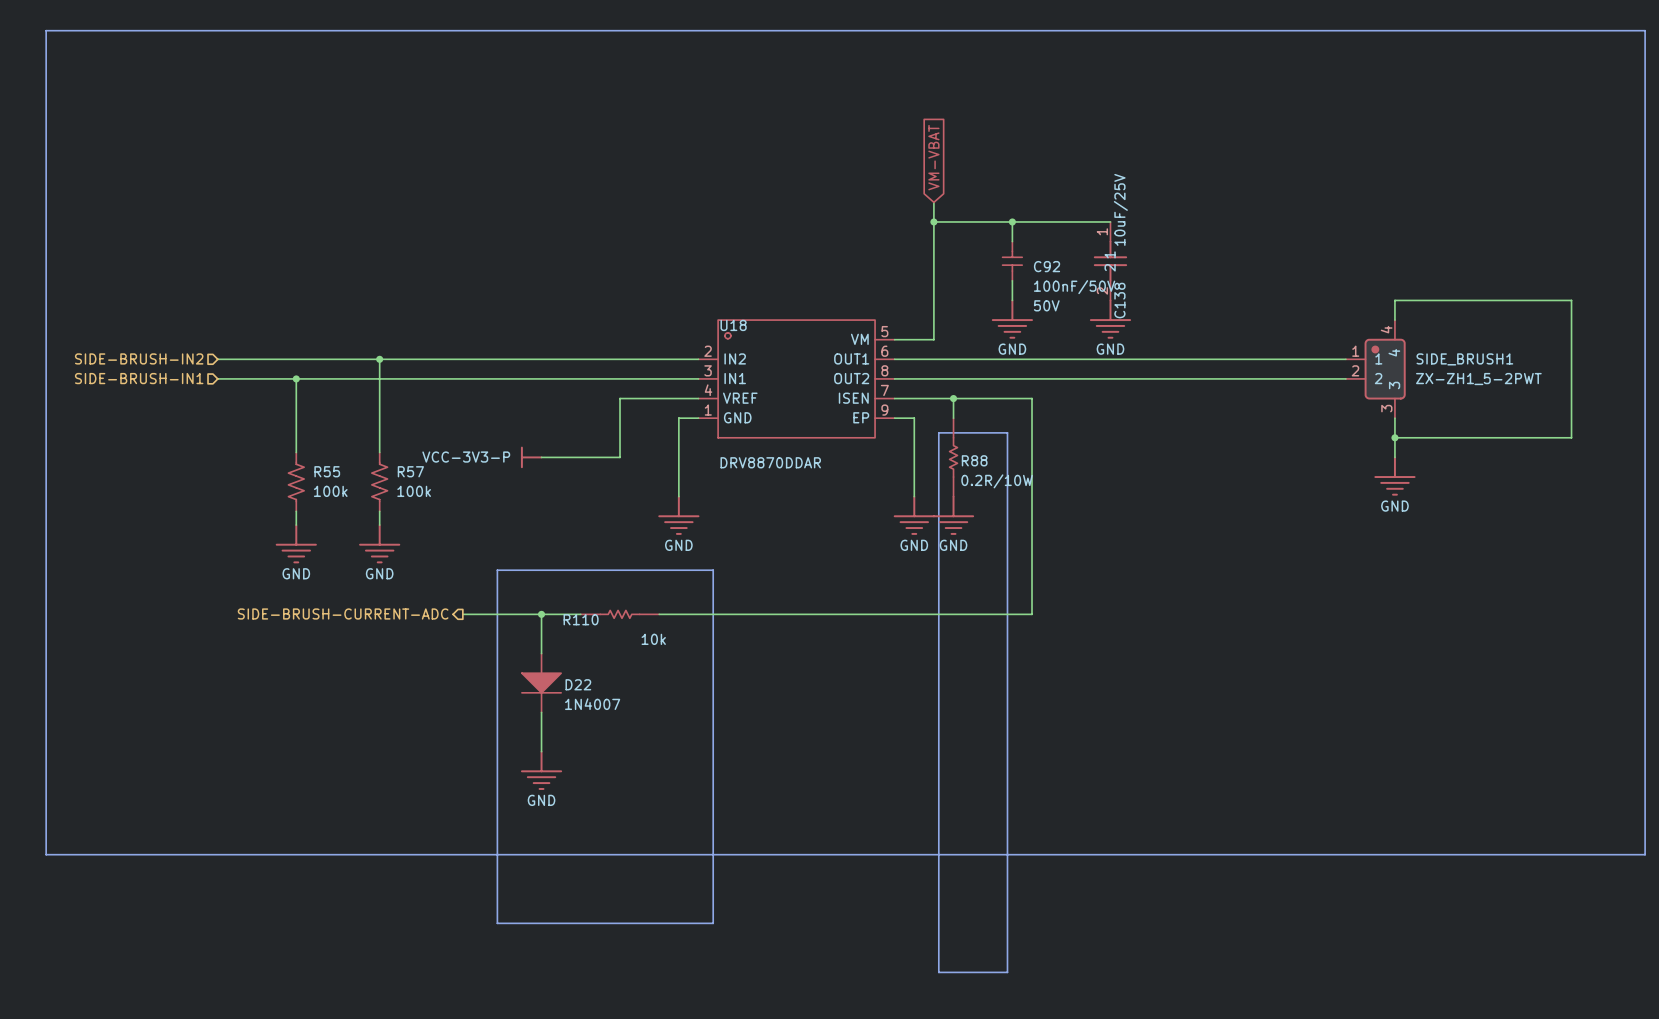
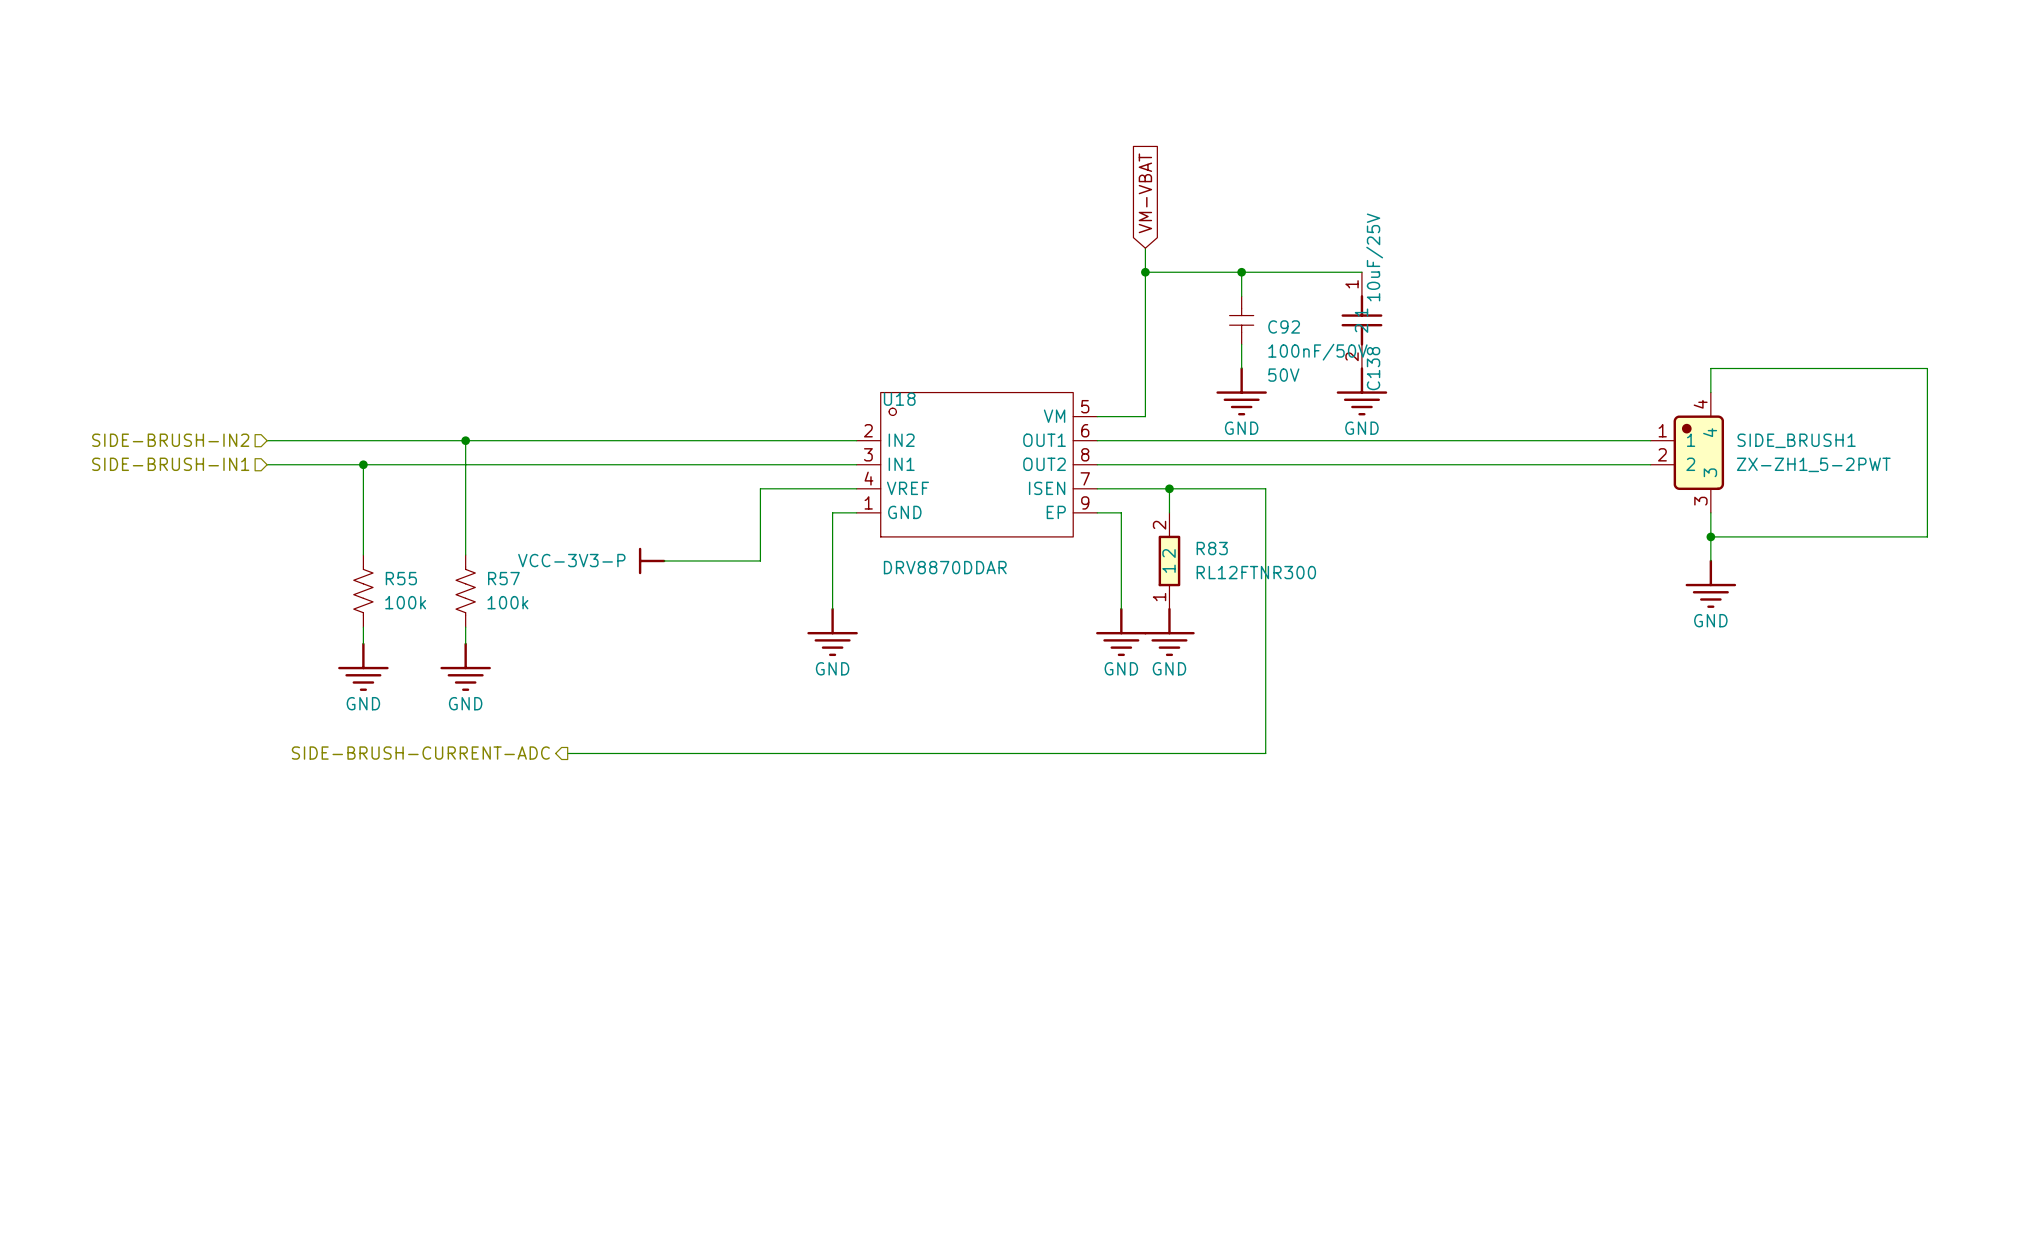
line: (46, 30) (1645, 30) (1645, 854) (46, 854) (46, 30) -> none
line: (938, 432) (1007, 432) (1007, 972) (938, 972) (938, 432) -> none
R88: 0.2R/10W (953, 457) -> none
R83: none -> RL12FTNR300 (1169, 560)
line: (497, 570) (713, 570) (713, 923) (497, 923) (497, 570) -> none
wire: (541, 614) (541, 653) -> none
junction: (541, 614) -> none
R110: 10k (620, 614) -> none
D22: 1N4007 (541, 683) -> none
wire: (541, 712) (541, 751) -> none
power symbol: GND (541, 770) -> none

